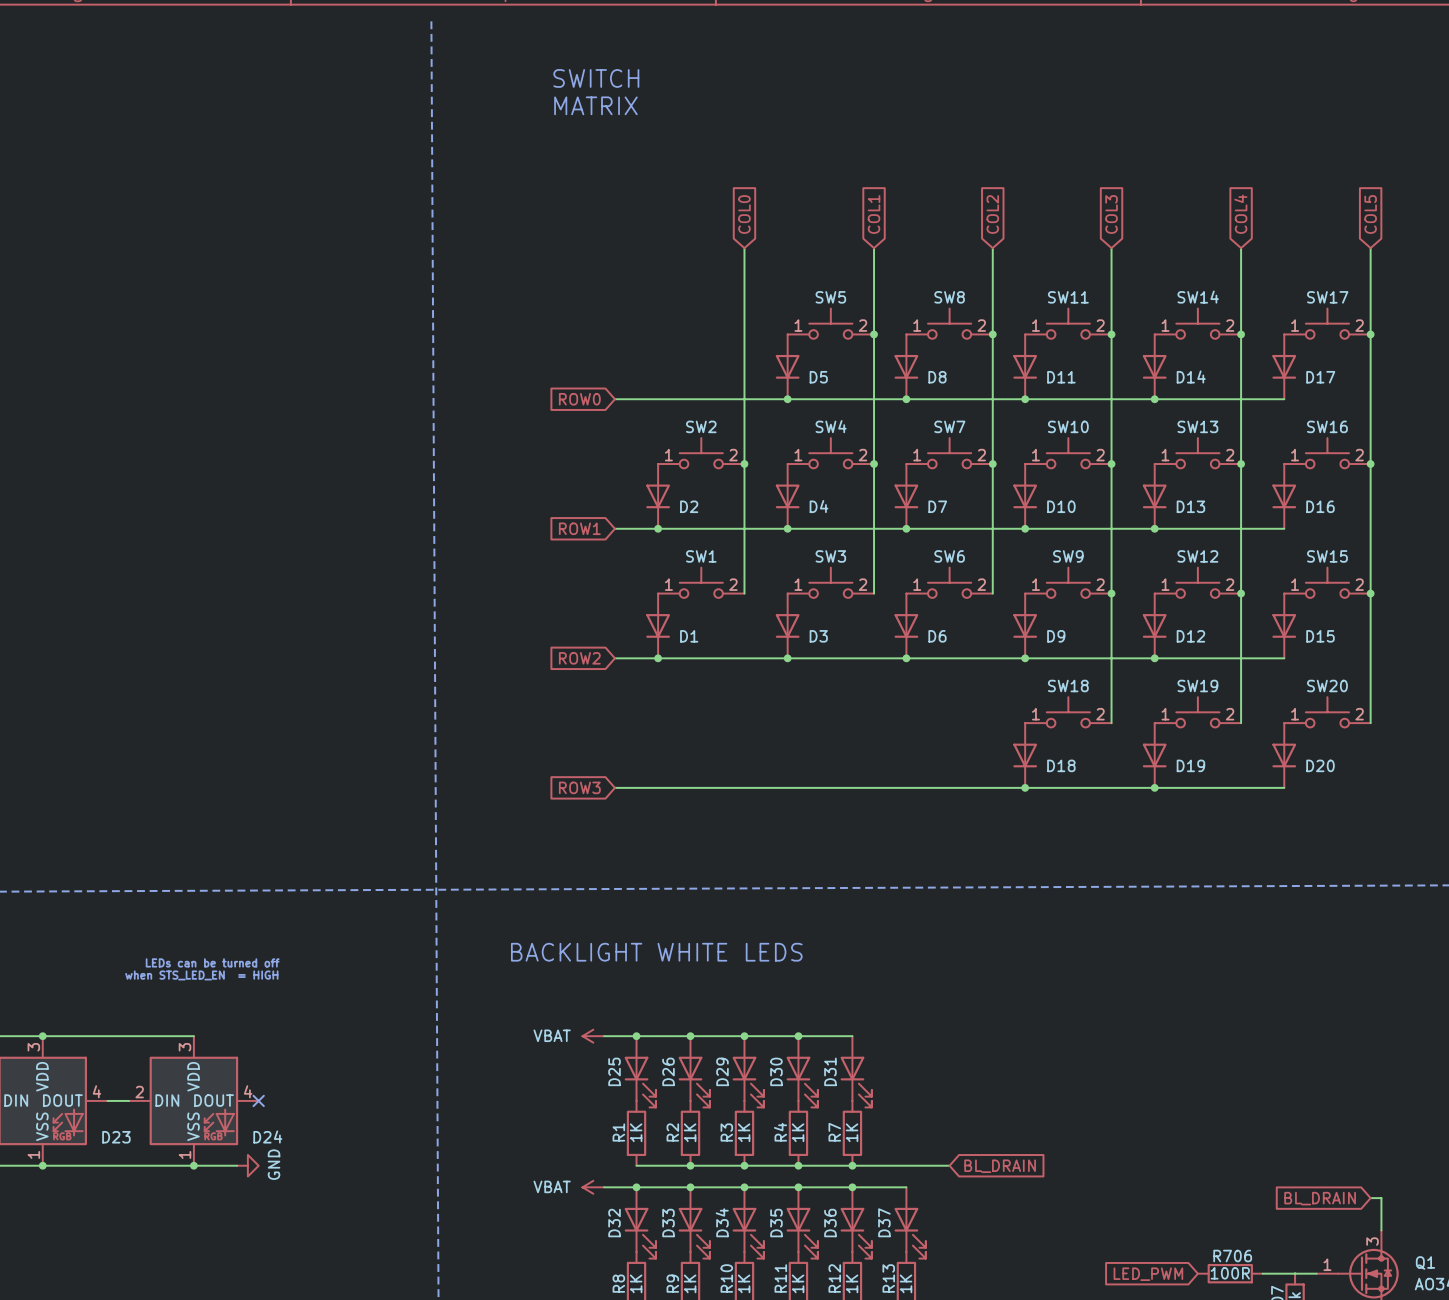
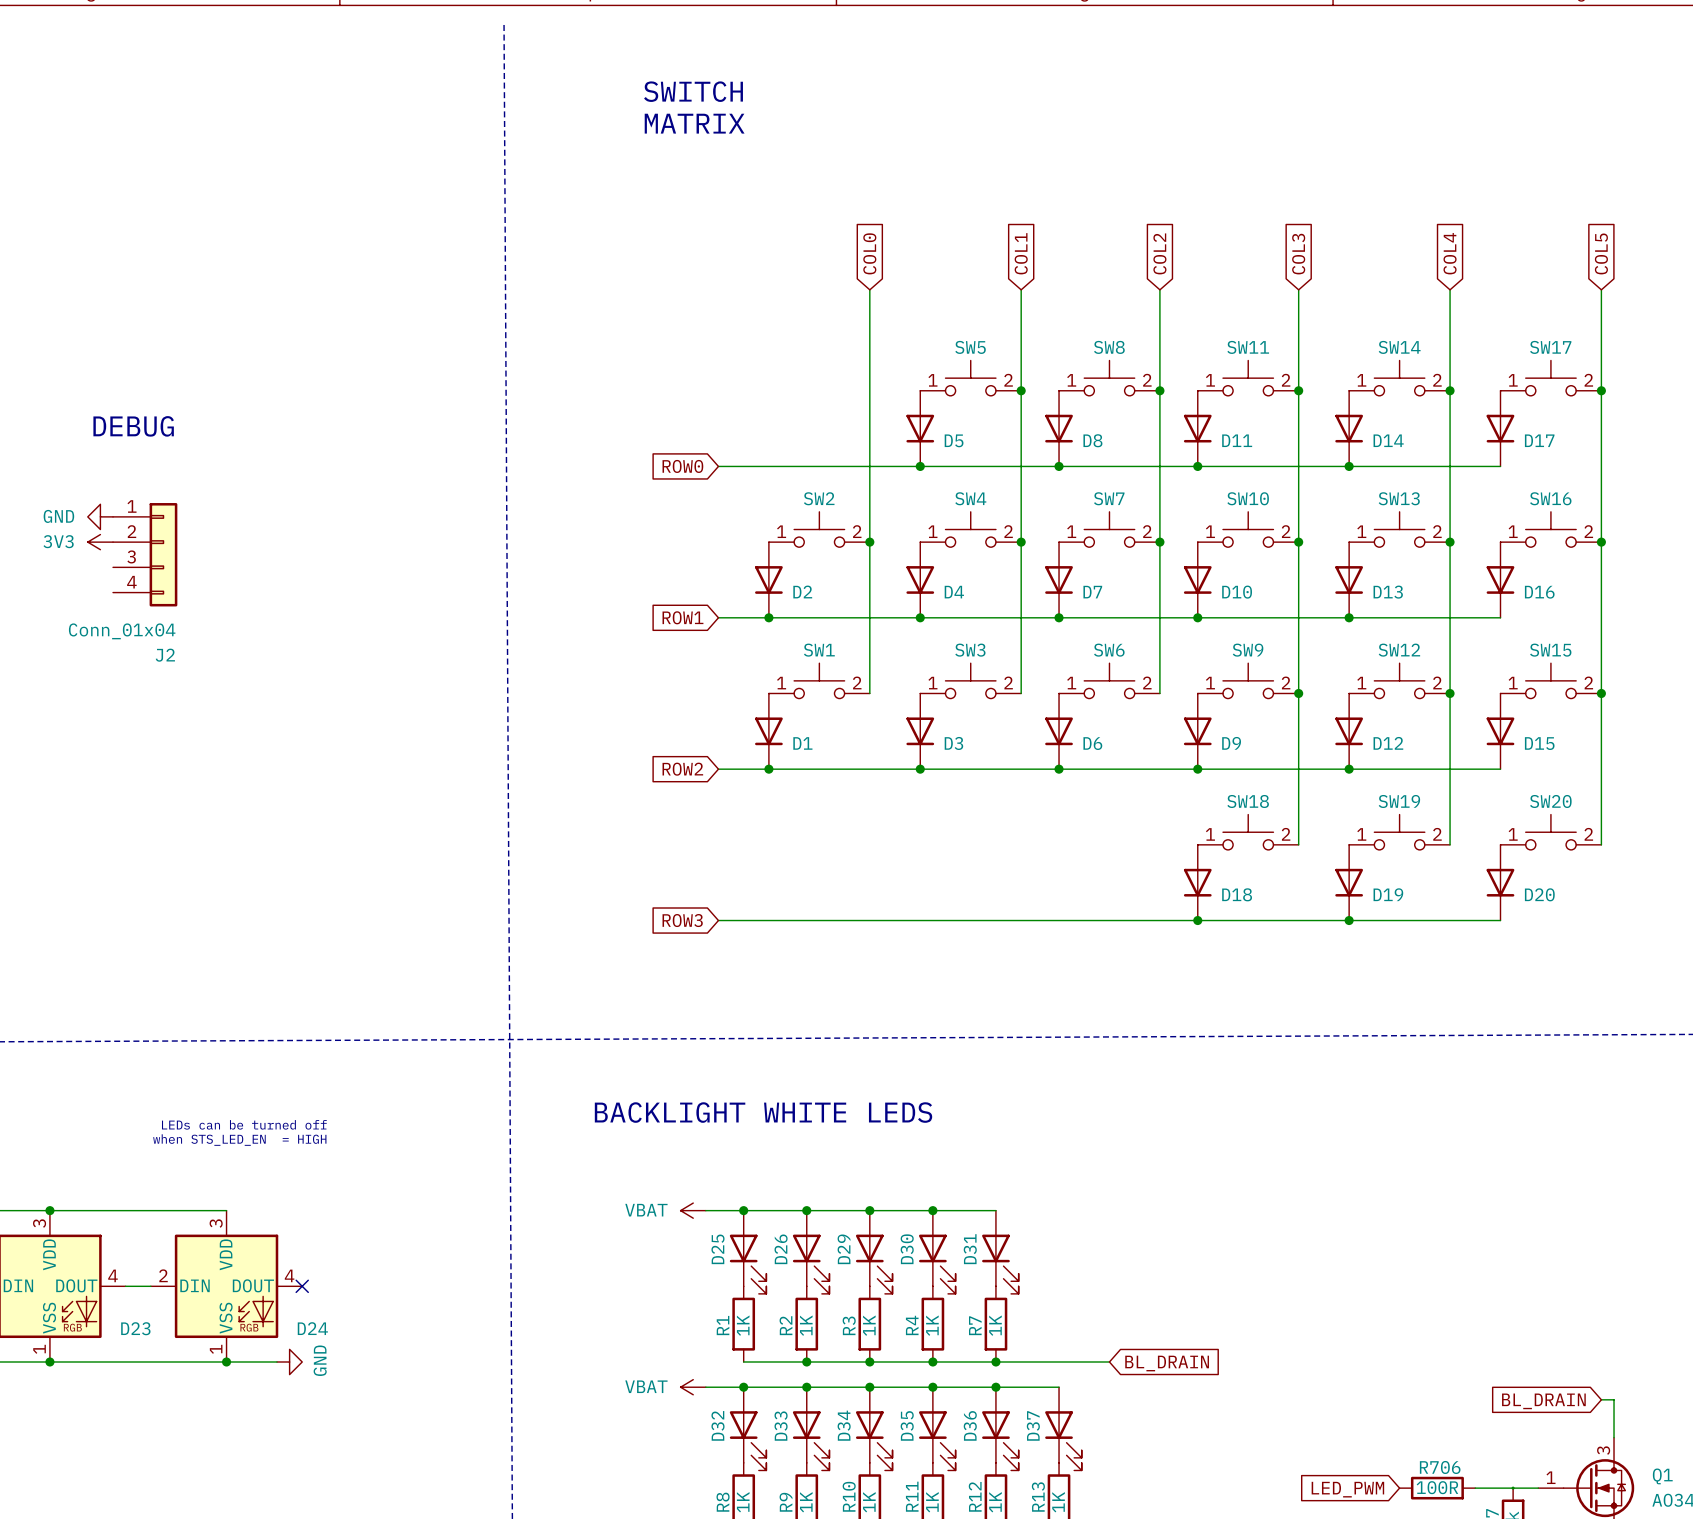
text: none -> DEBUG (133, 426)
power symbol: none -> GND (100, 516)
power symbol: none -> 3V3 (100, 542)
J2: none -> Conn_01x04 (145, 554)

